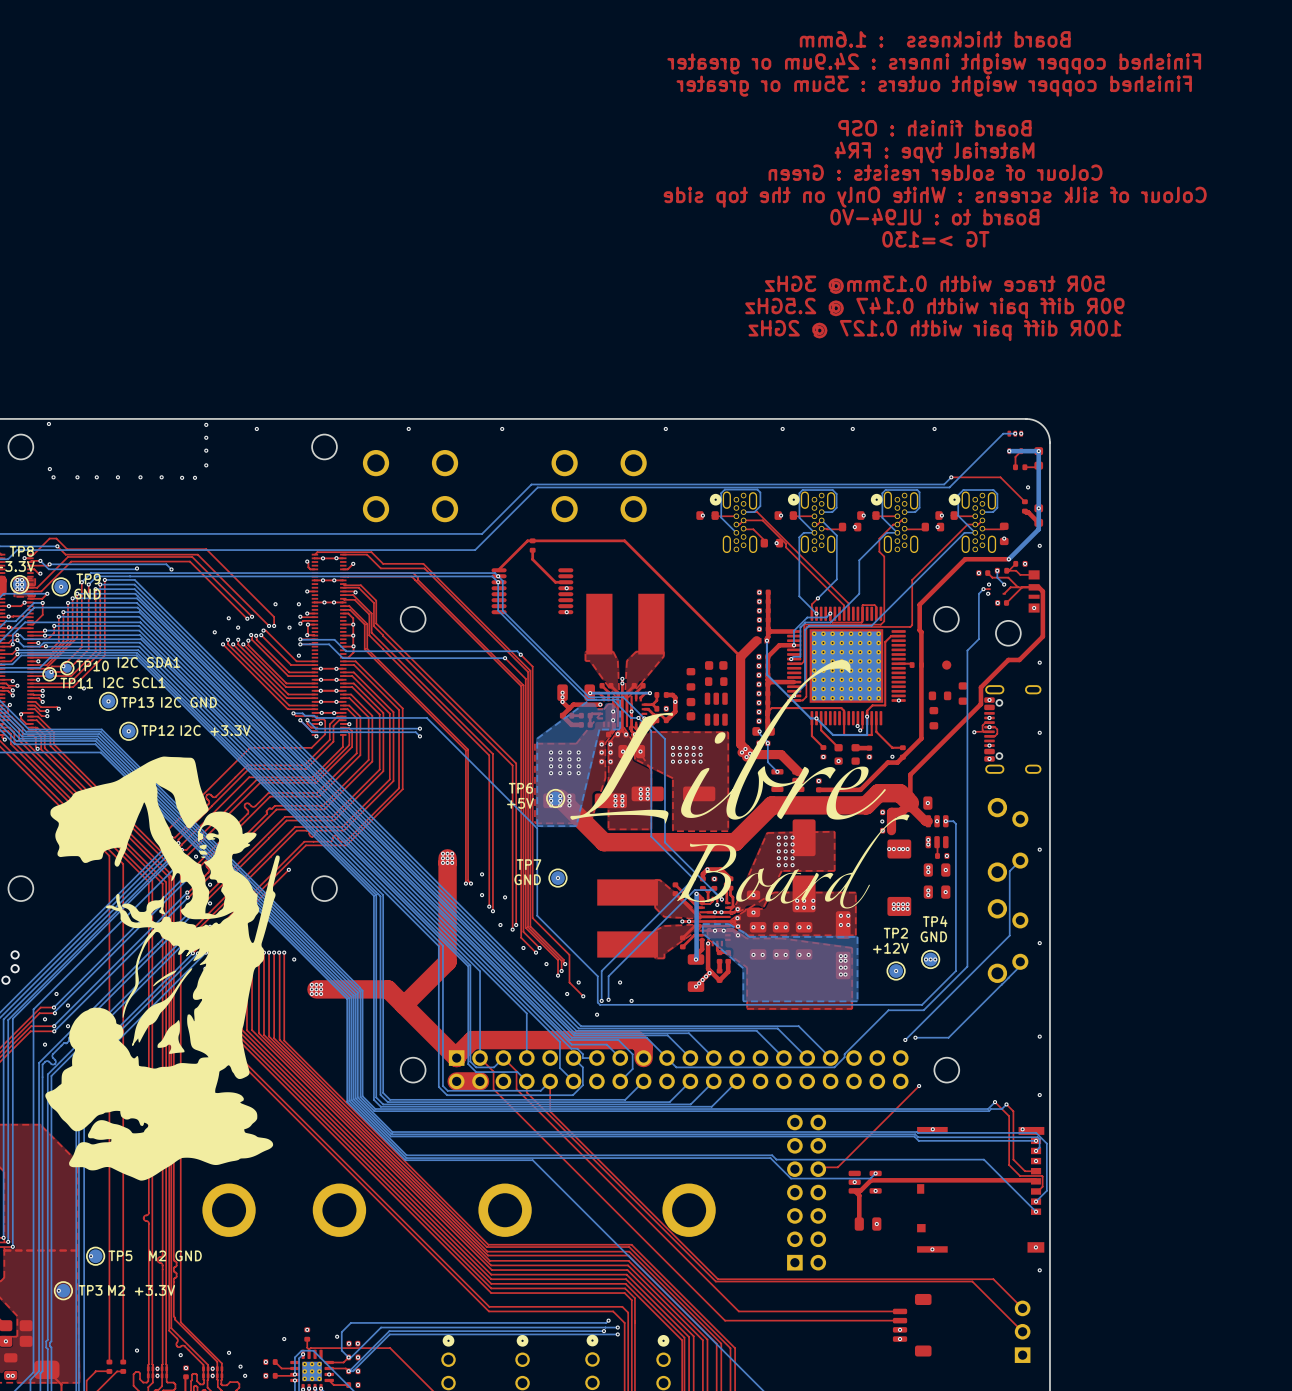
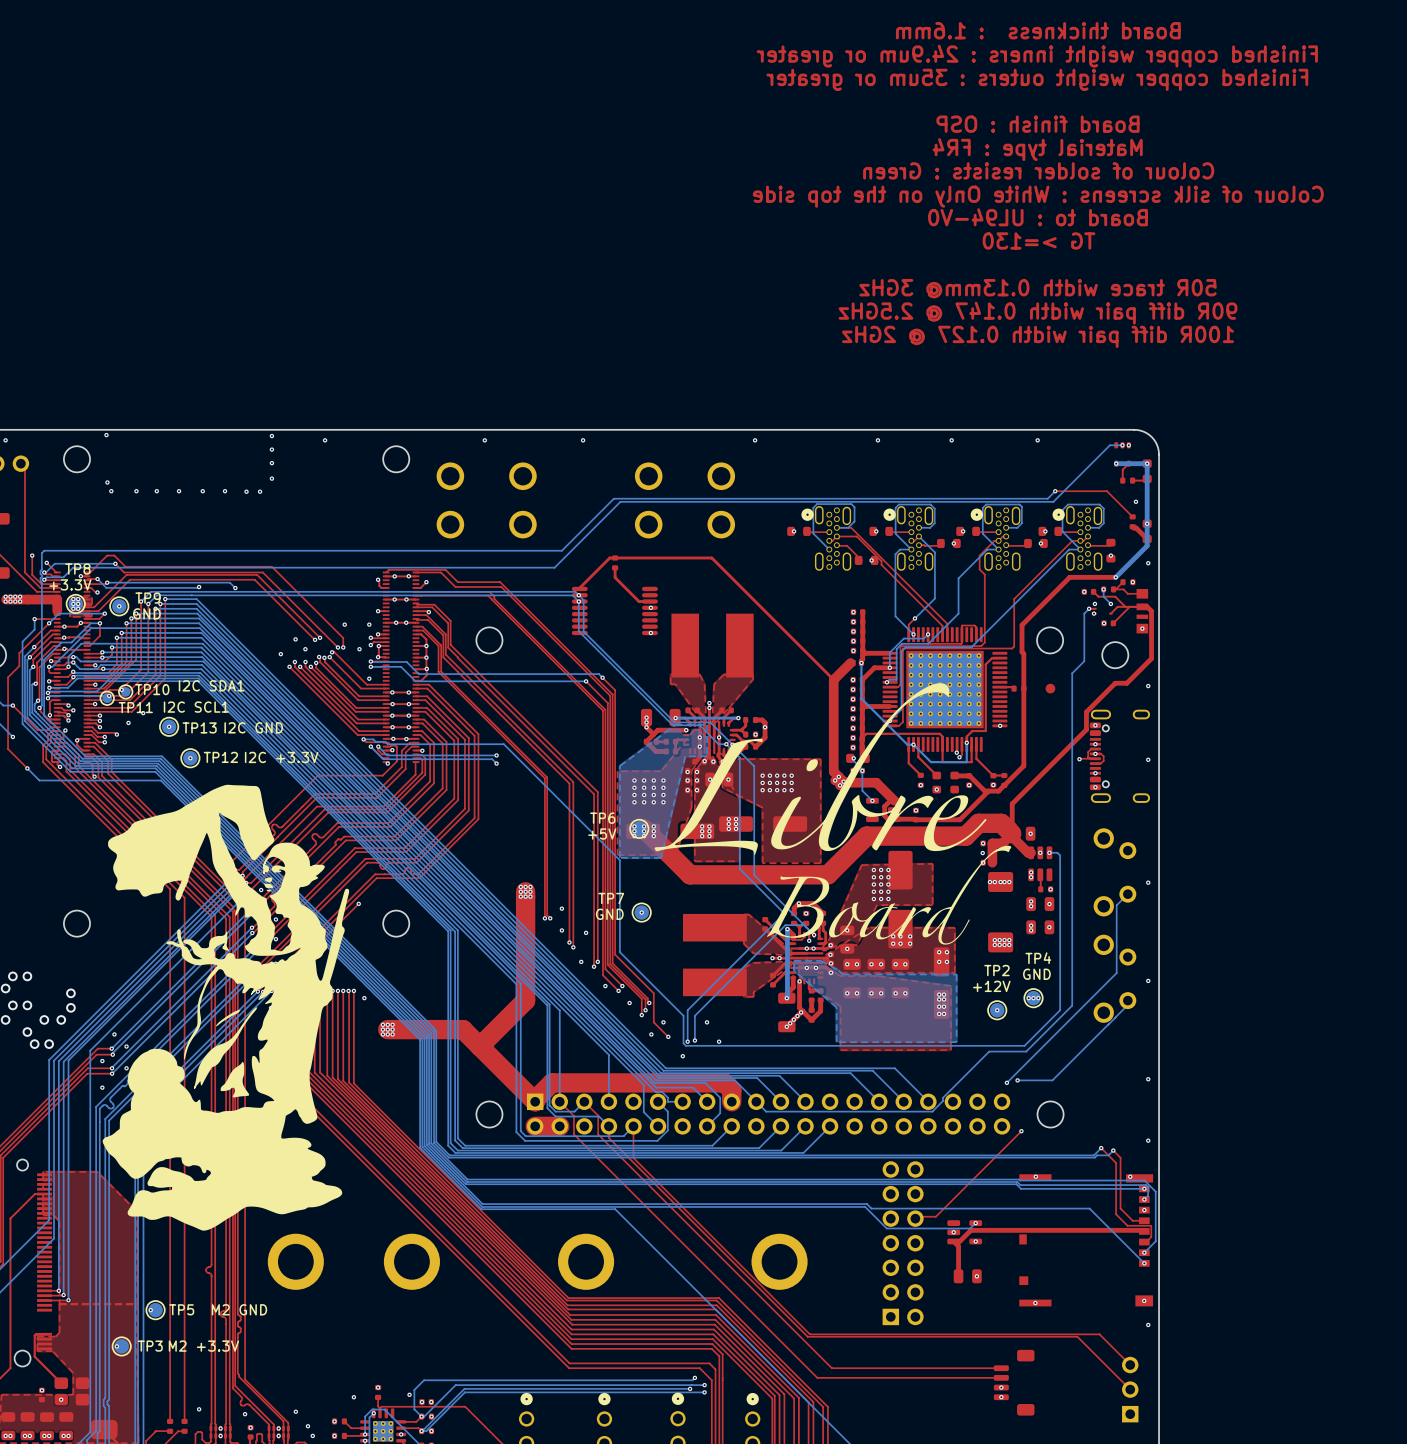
part: (716, 665) -> none
part: (690, 679) -> none
part: (716, 681) -> none
part: (963, 693) -> none
part: (940, 695) -> none
part: (690, 709) -> none
part: (716, 709) -> none
part: (933, 718) -> none
top track: none -> (969, 775) (984, 791) (988, 791)
part: none -> (993, 780)
top track: none -> (894, 800) (890, 800) (884, 806) (884, 815) (888, 819) (915, 819)

